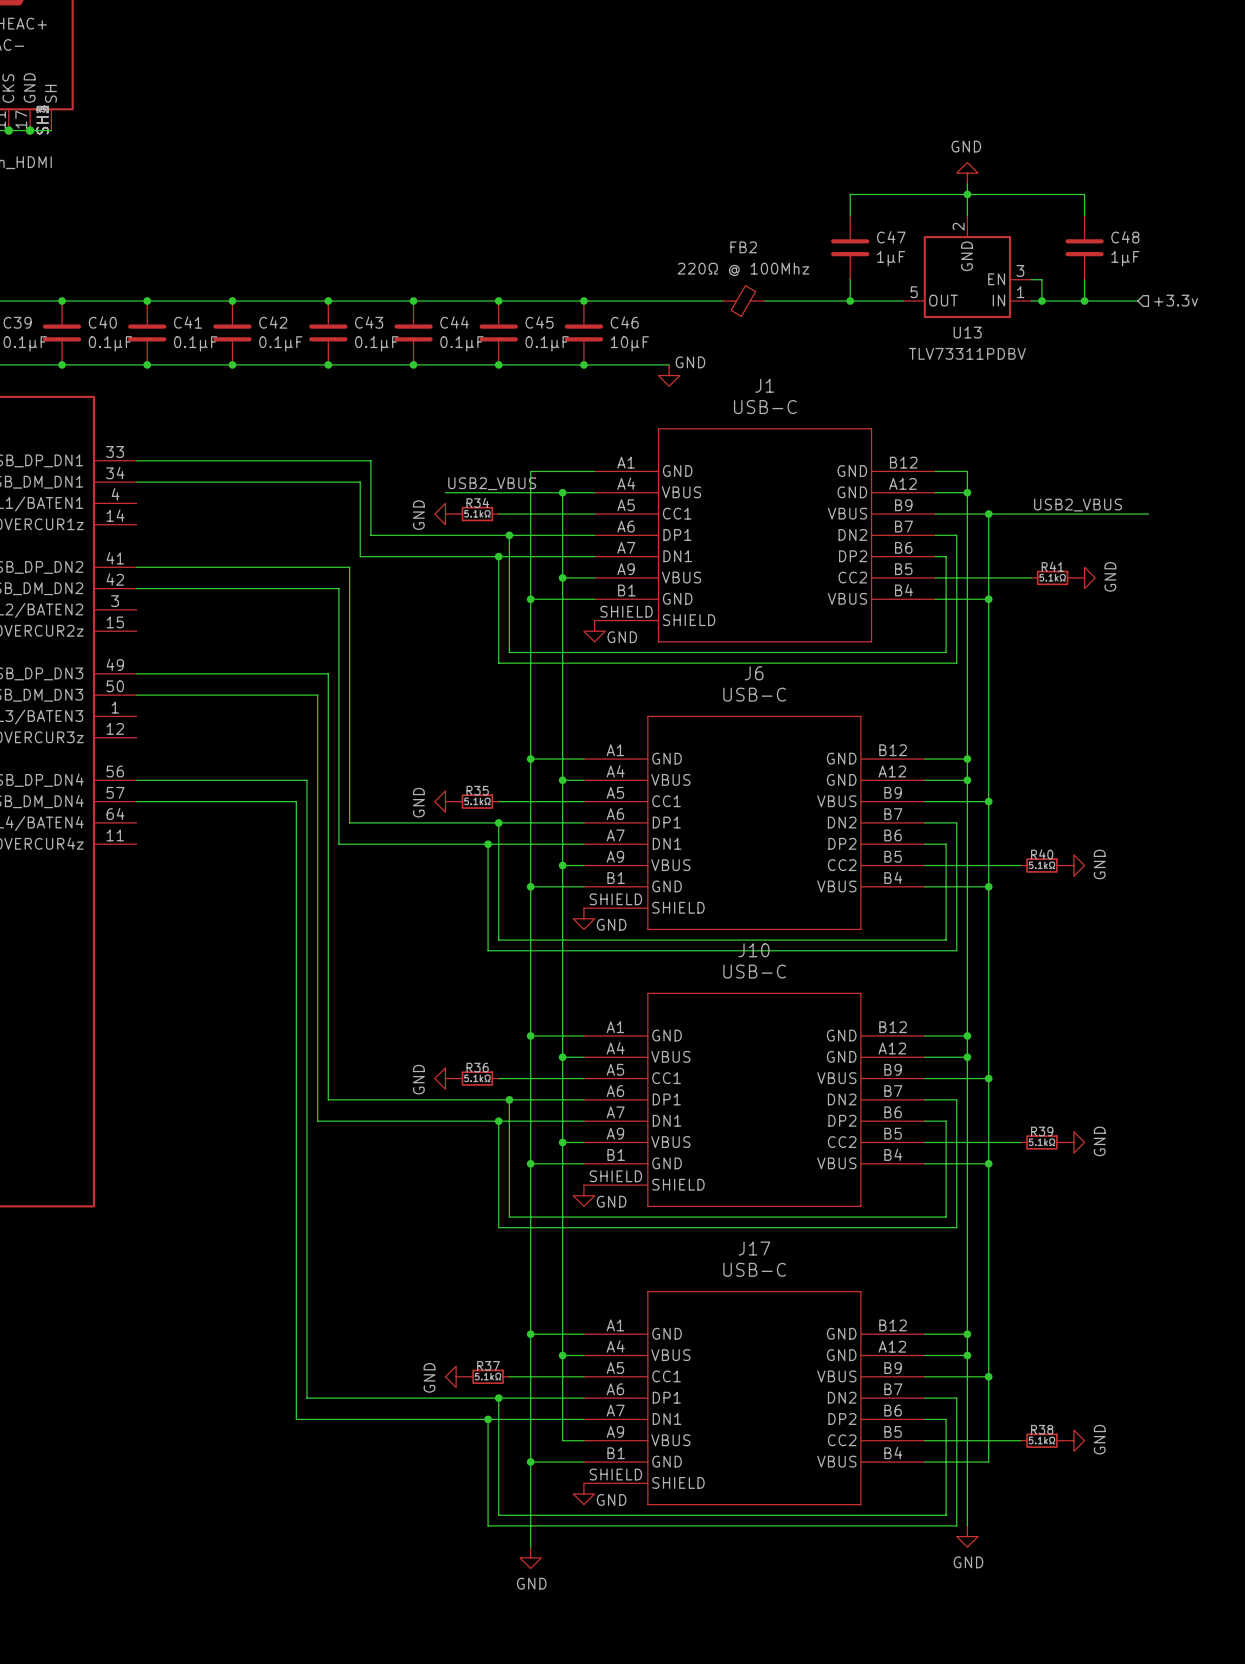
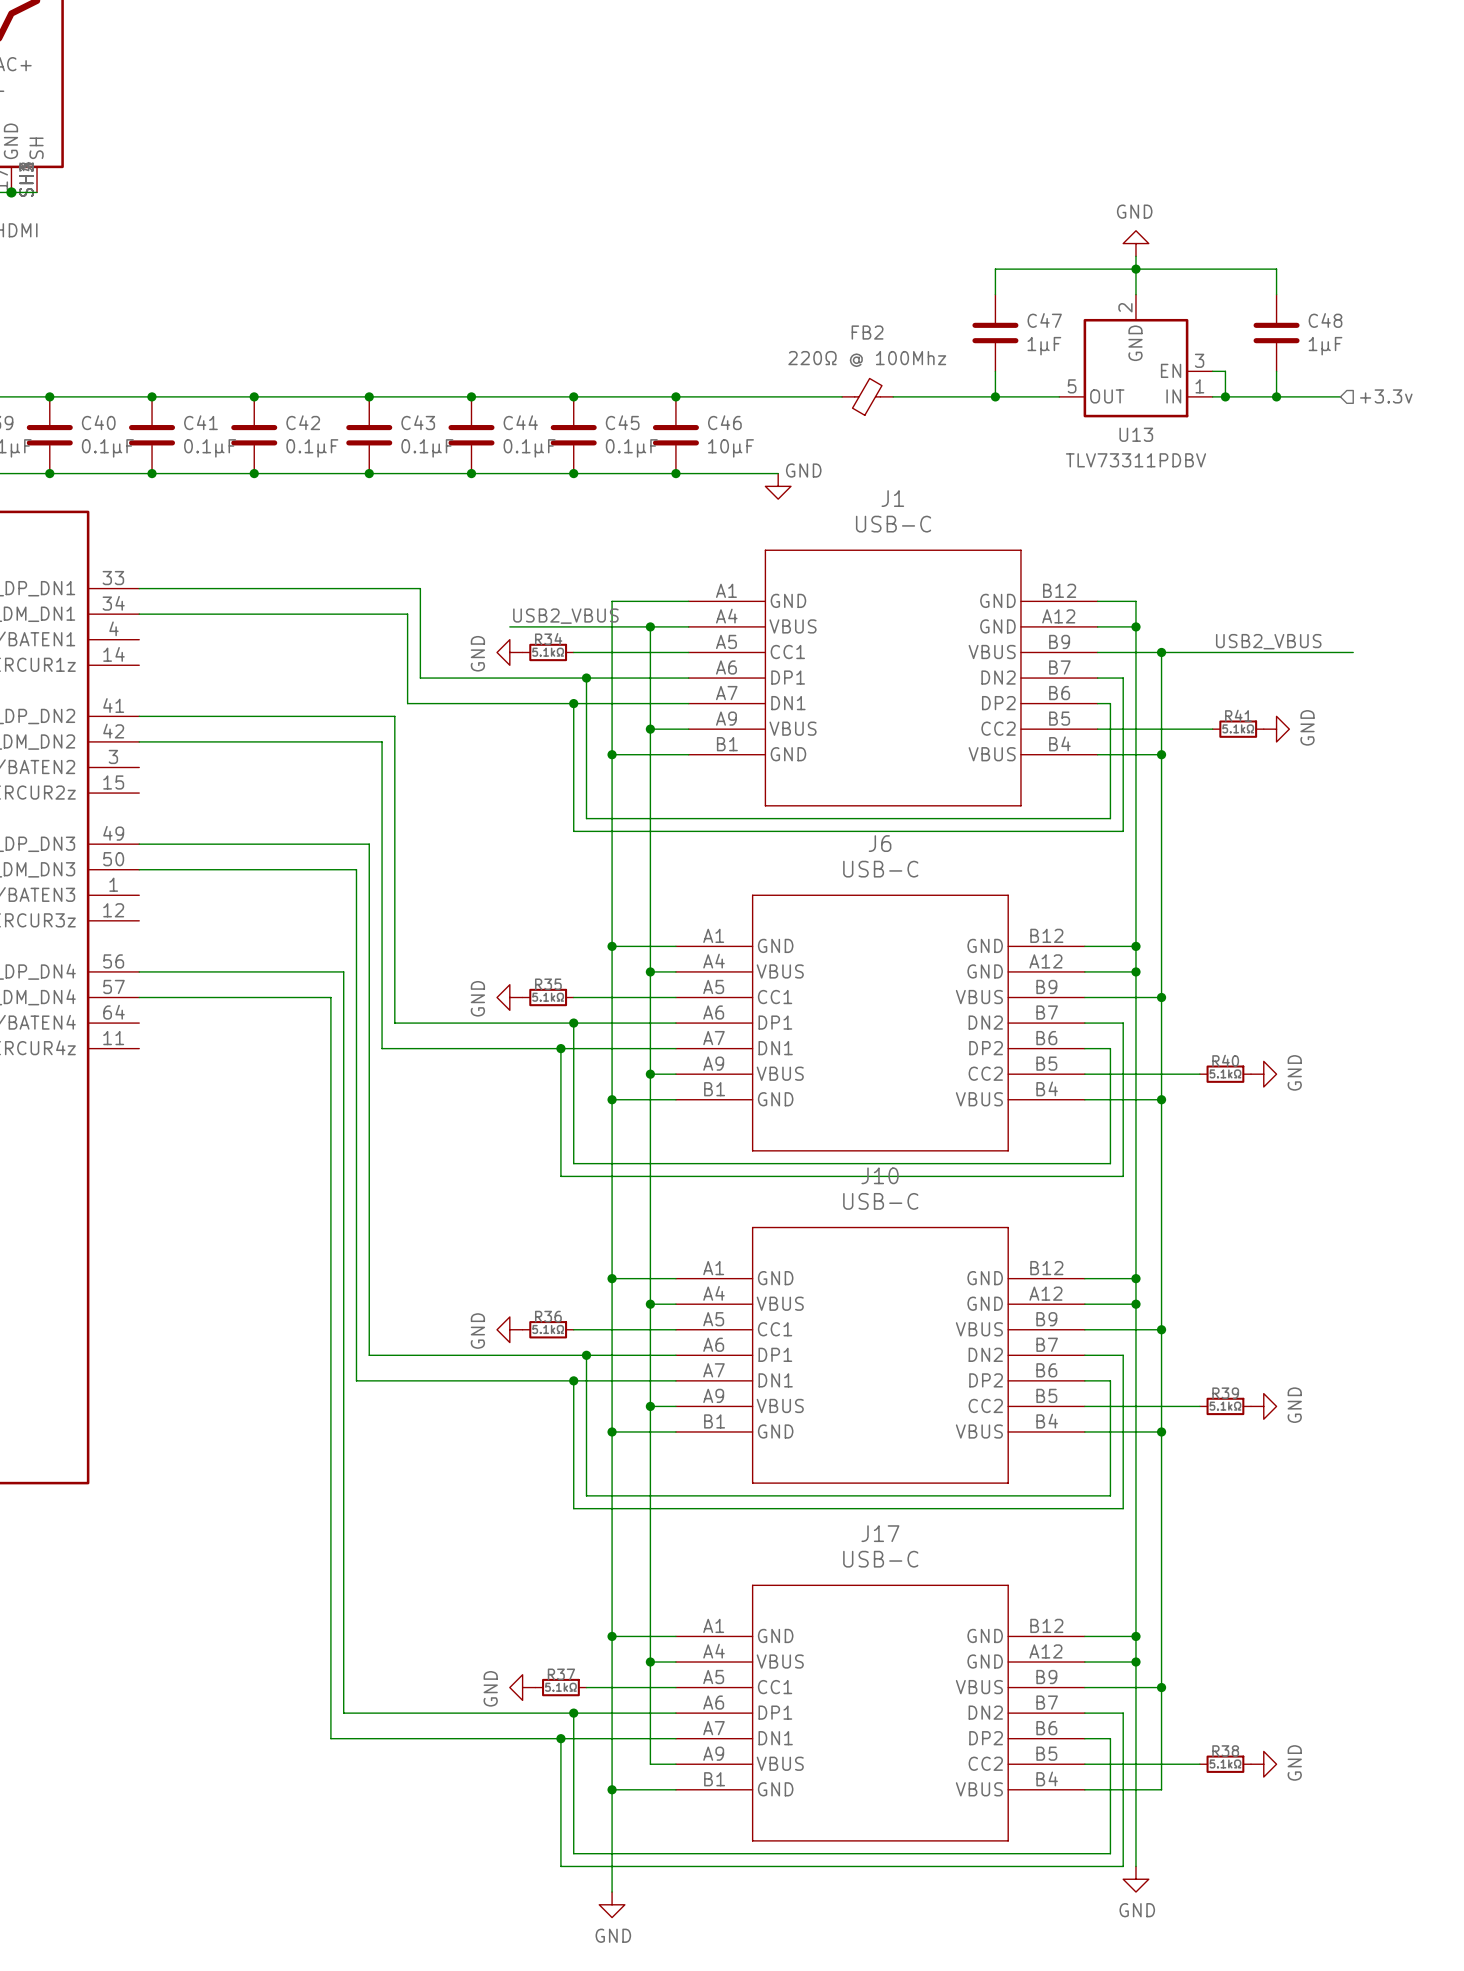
J1 symbol: [594, 428, 936, 643] -> [688, 549, 1098, 807]
power symbol: GND (594, 631) -> none
J6 symbol: [583, 715, 925, 930] -> [675, 894, 1085, 1152]
power symbol: GND (583, 918) -> none
J10 symbol: [583, 992, 925, 1207] -> [675, 1226, 1085, 1484]
power symbol: GND (583, 1195) -> none
J17 symbol: [583, 1291, 925, 1506] -> [675, 1584, 1085, 1842]
power symbol: GND (583, 1493) -> none

